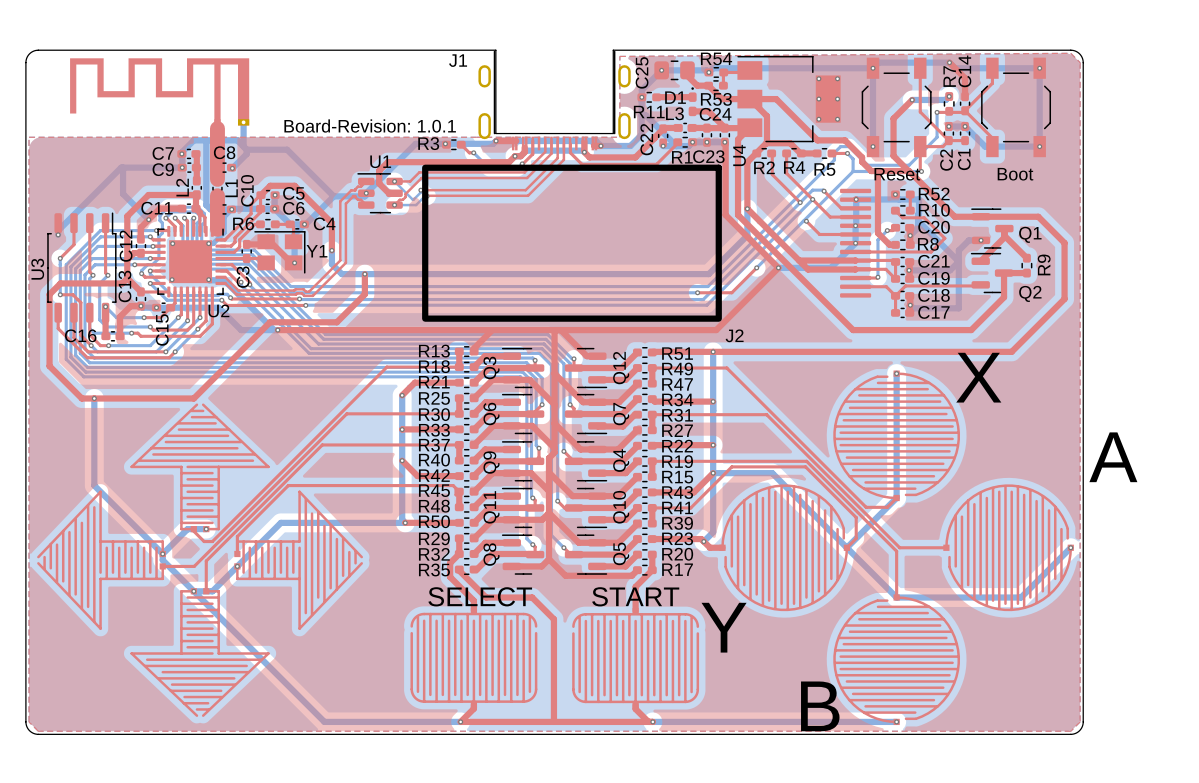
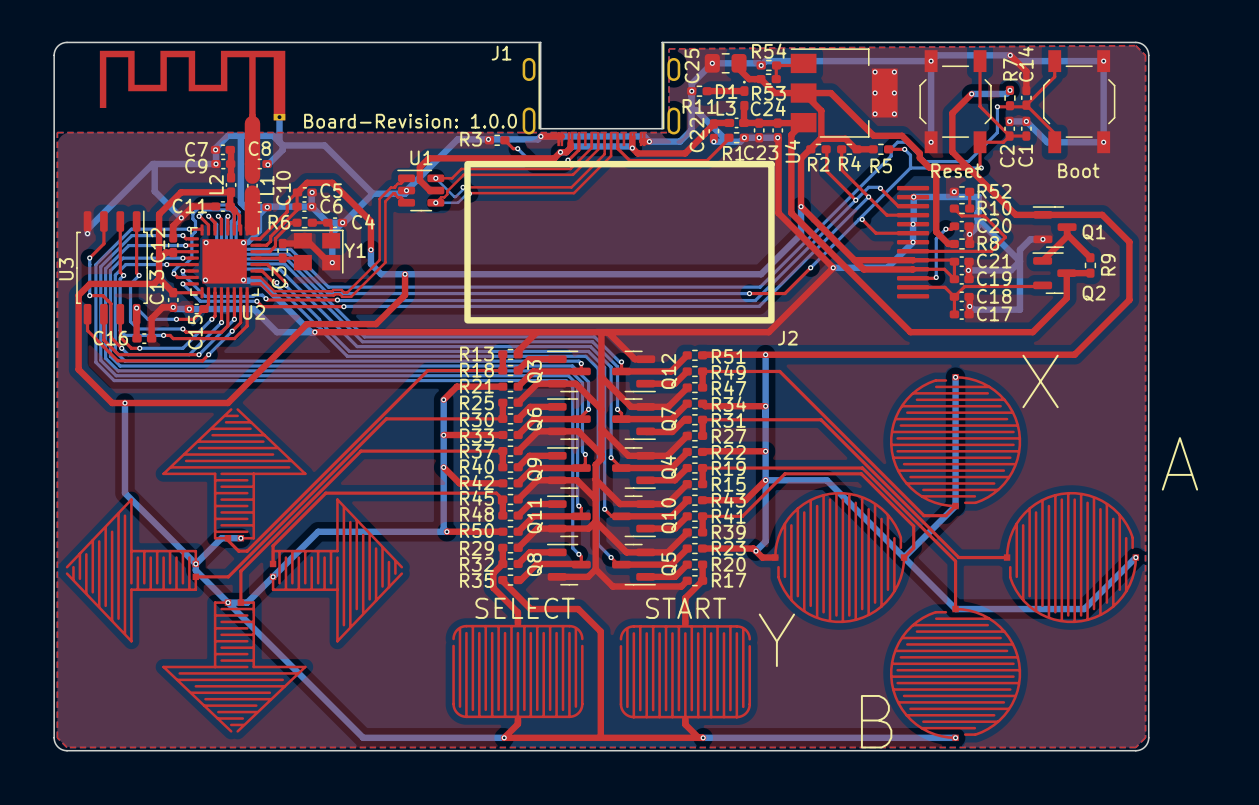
top track: (692, 111) (708, 111) (724, 128) -> none
top track: none -> (743, 106) (743, 122)
text: Board-Revision: 1.0.1 (370, 126) -> Board-Revision: 1.0.0 (410, 121)

